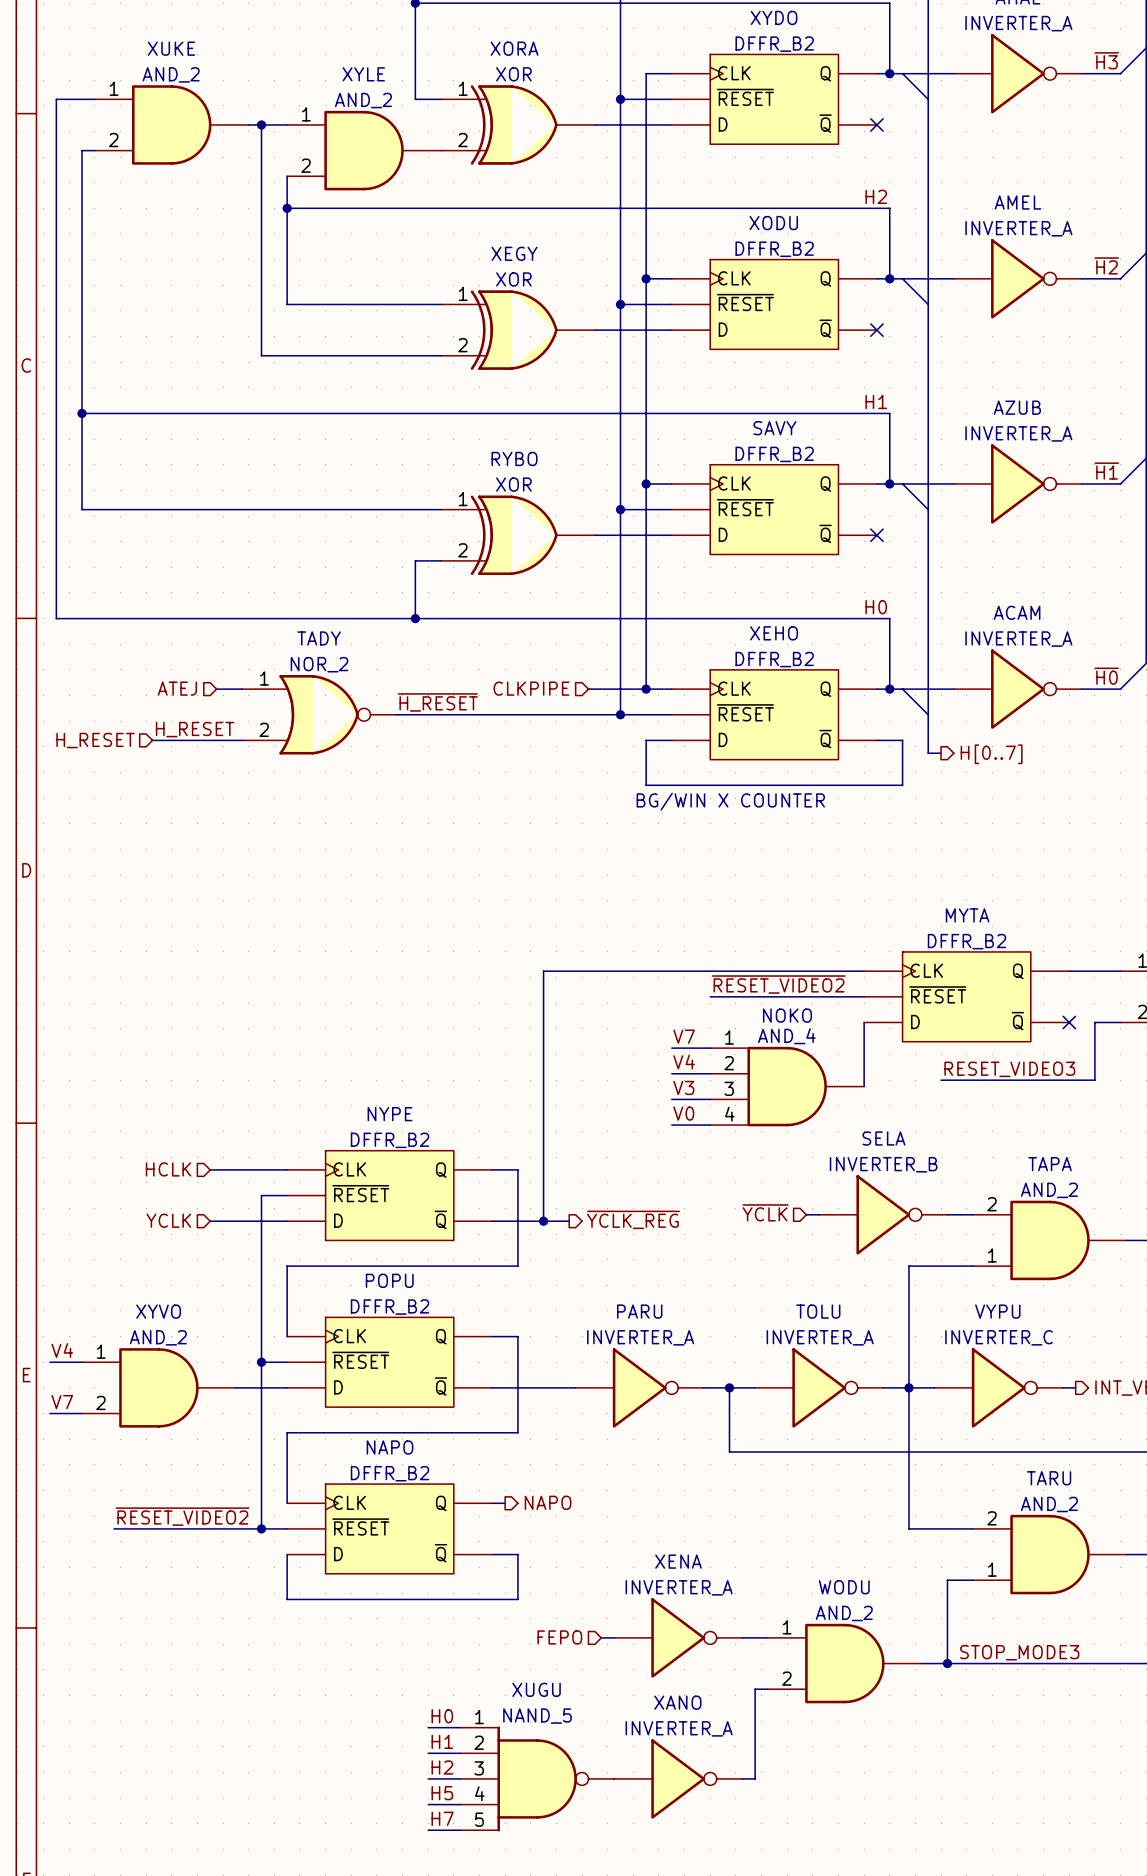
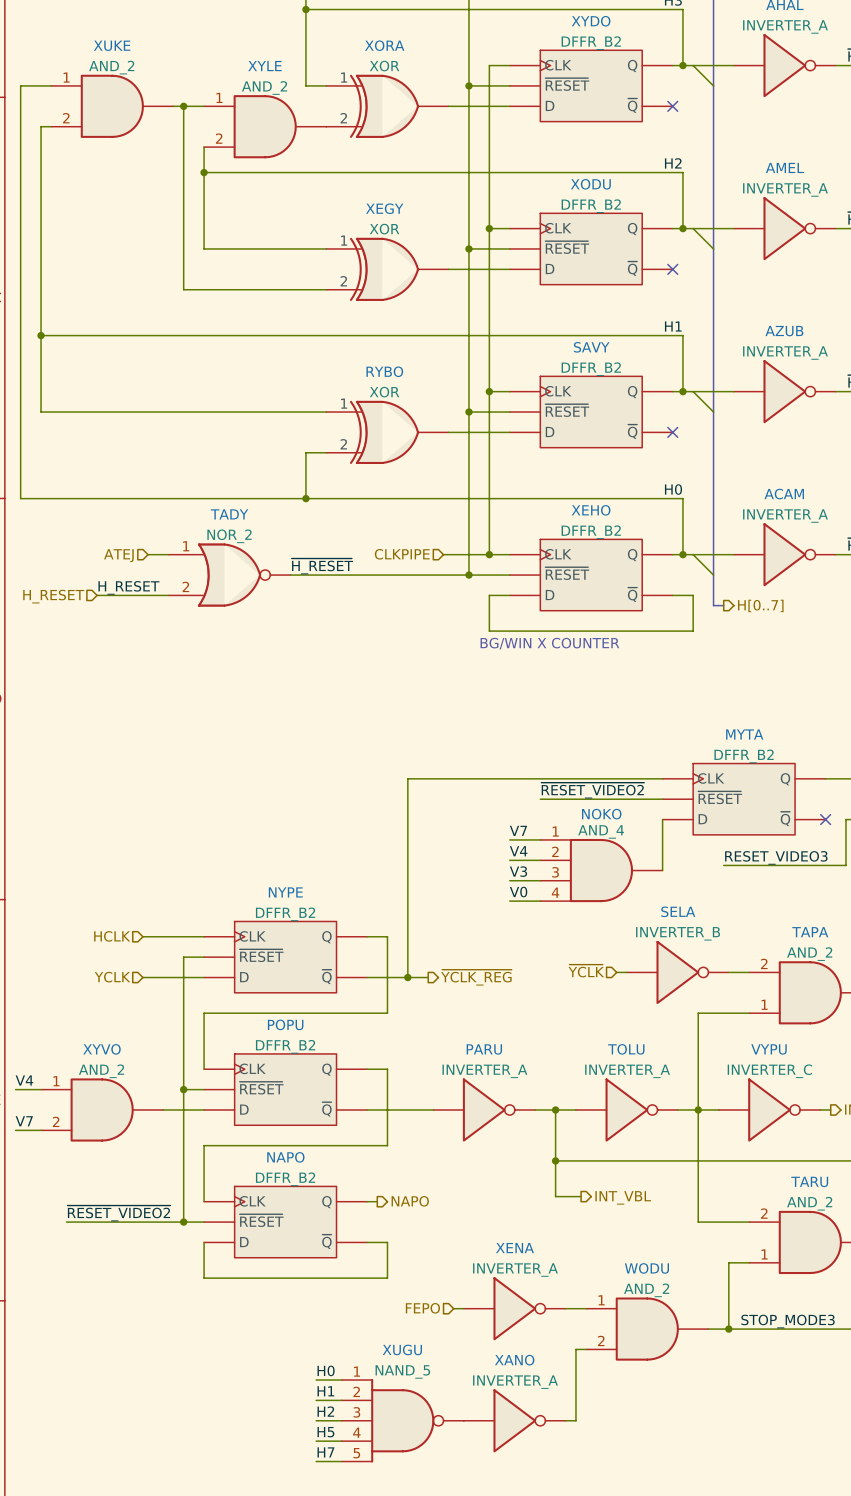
wire: none -> (555, 1160) (555, 1196) (581, 1196)
junction: none -> (555, 1160)
hierarchical label: none -> INT_VBL (623, 1197)

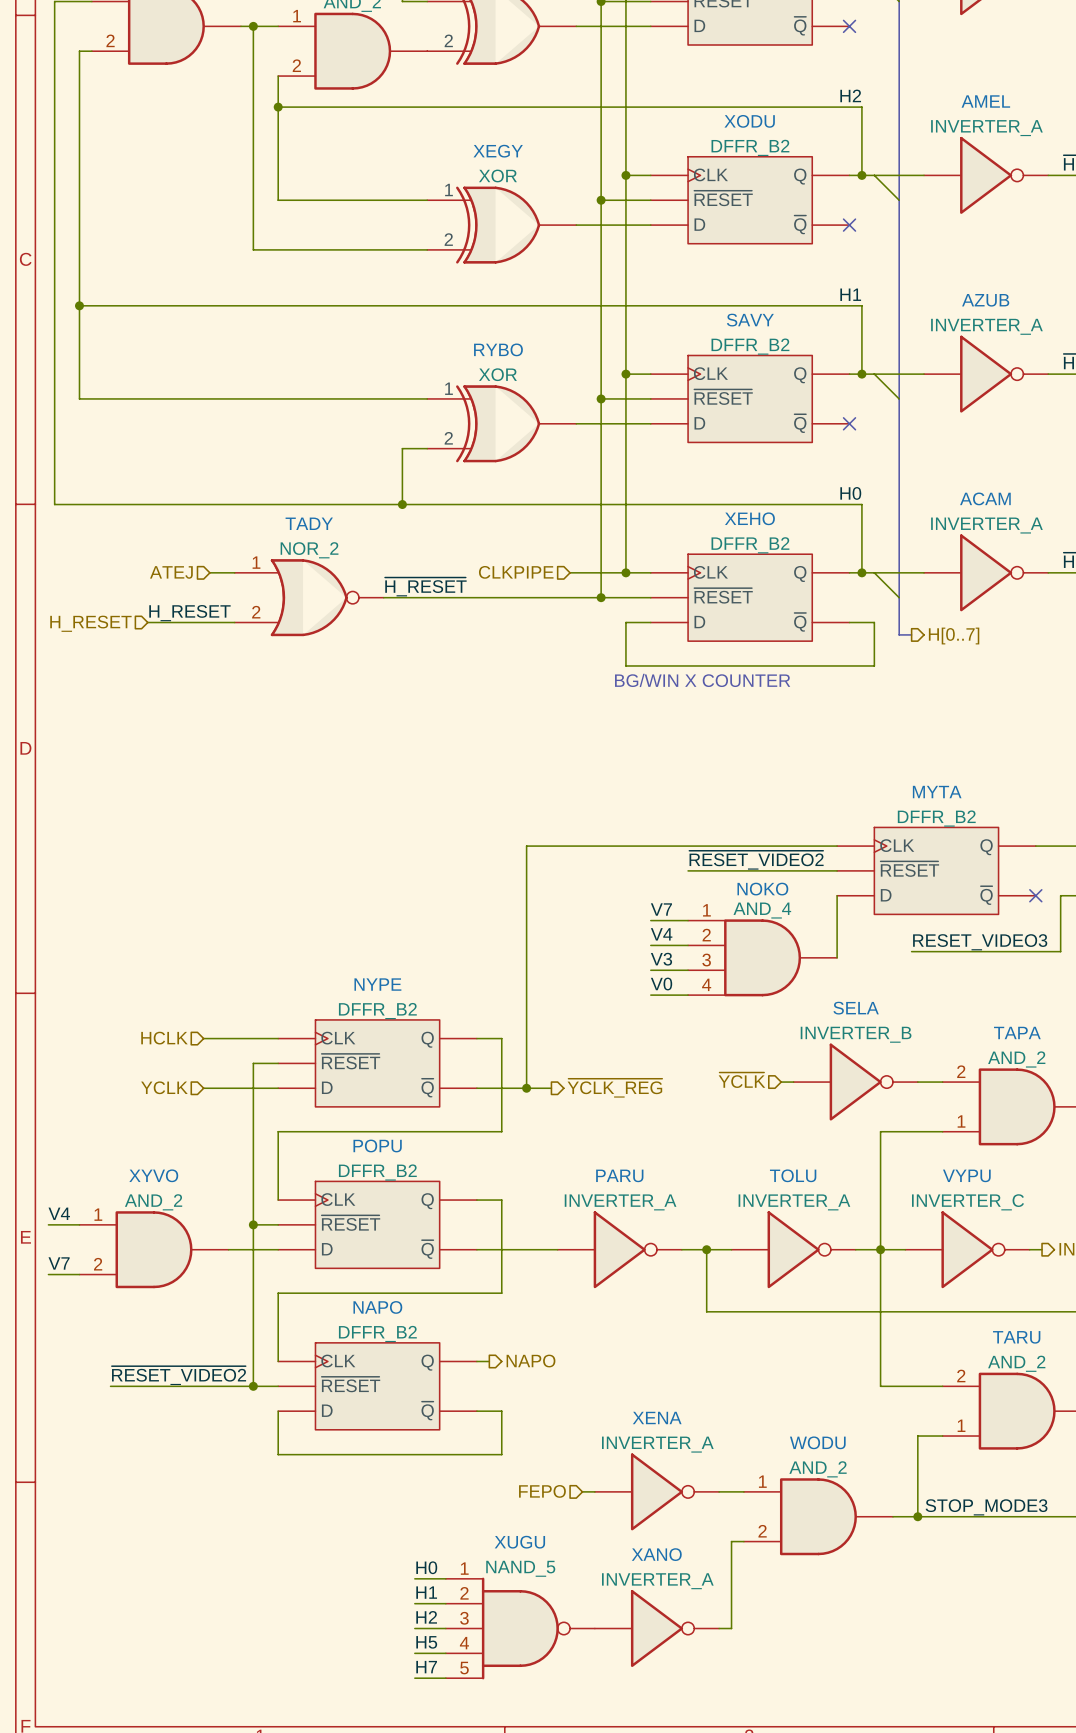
wire: (555, 1160) (555, 1196) (581, 1196) -> none
junction: (555, 1160) -> none
hierarchical label: INT_VBL (623, 1197) -> none

